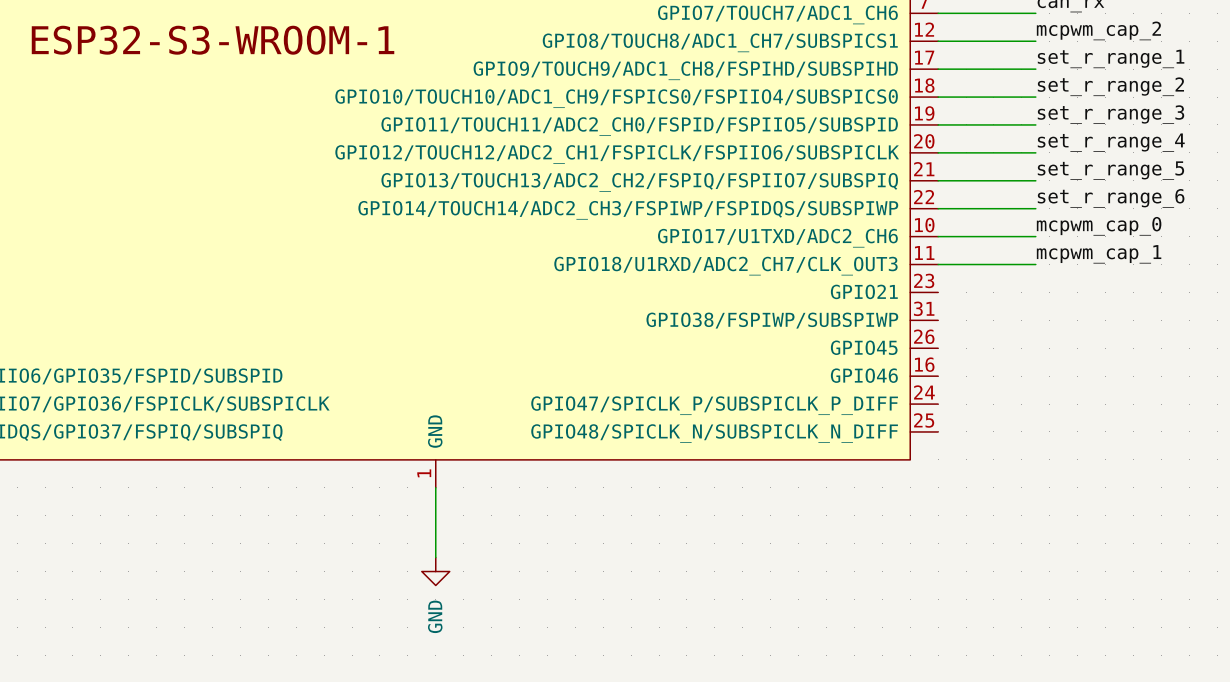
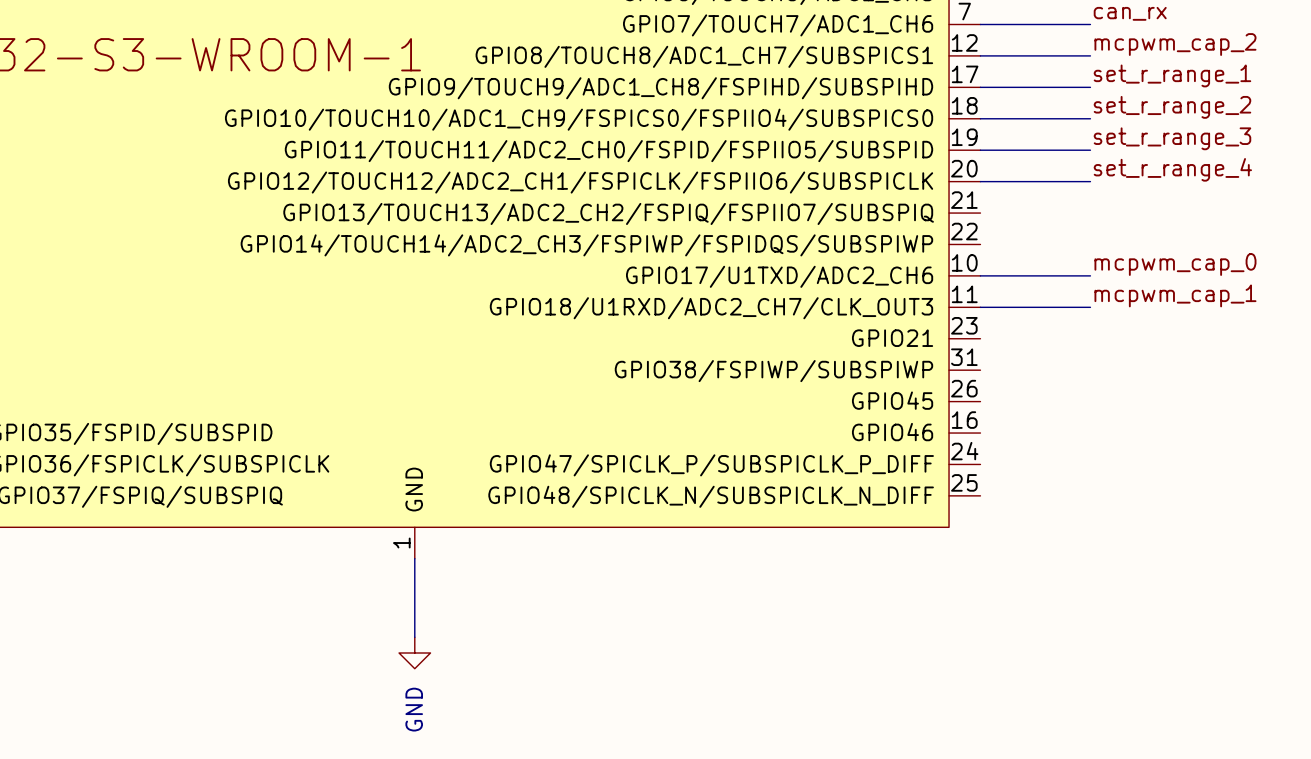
label: set_r_range_5 (1110, 170) -> none
wire: (938, 180) (1035, 180) -> none
label: set_r_range_6 (1111, 198) -> none
wire: (938, 208) (1035, 208) -> none

